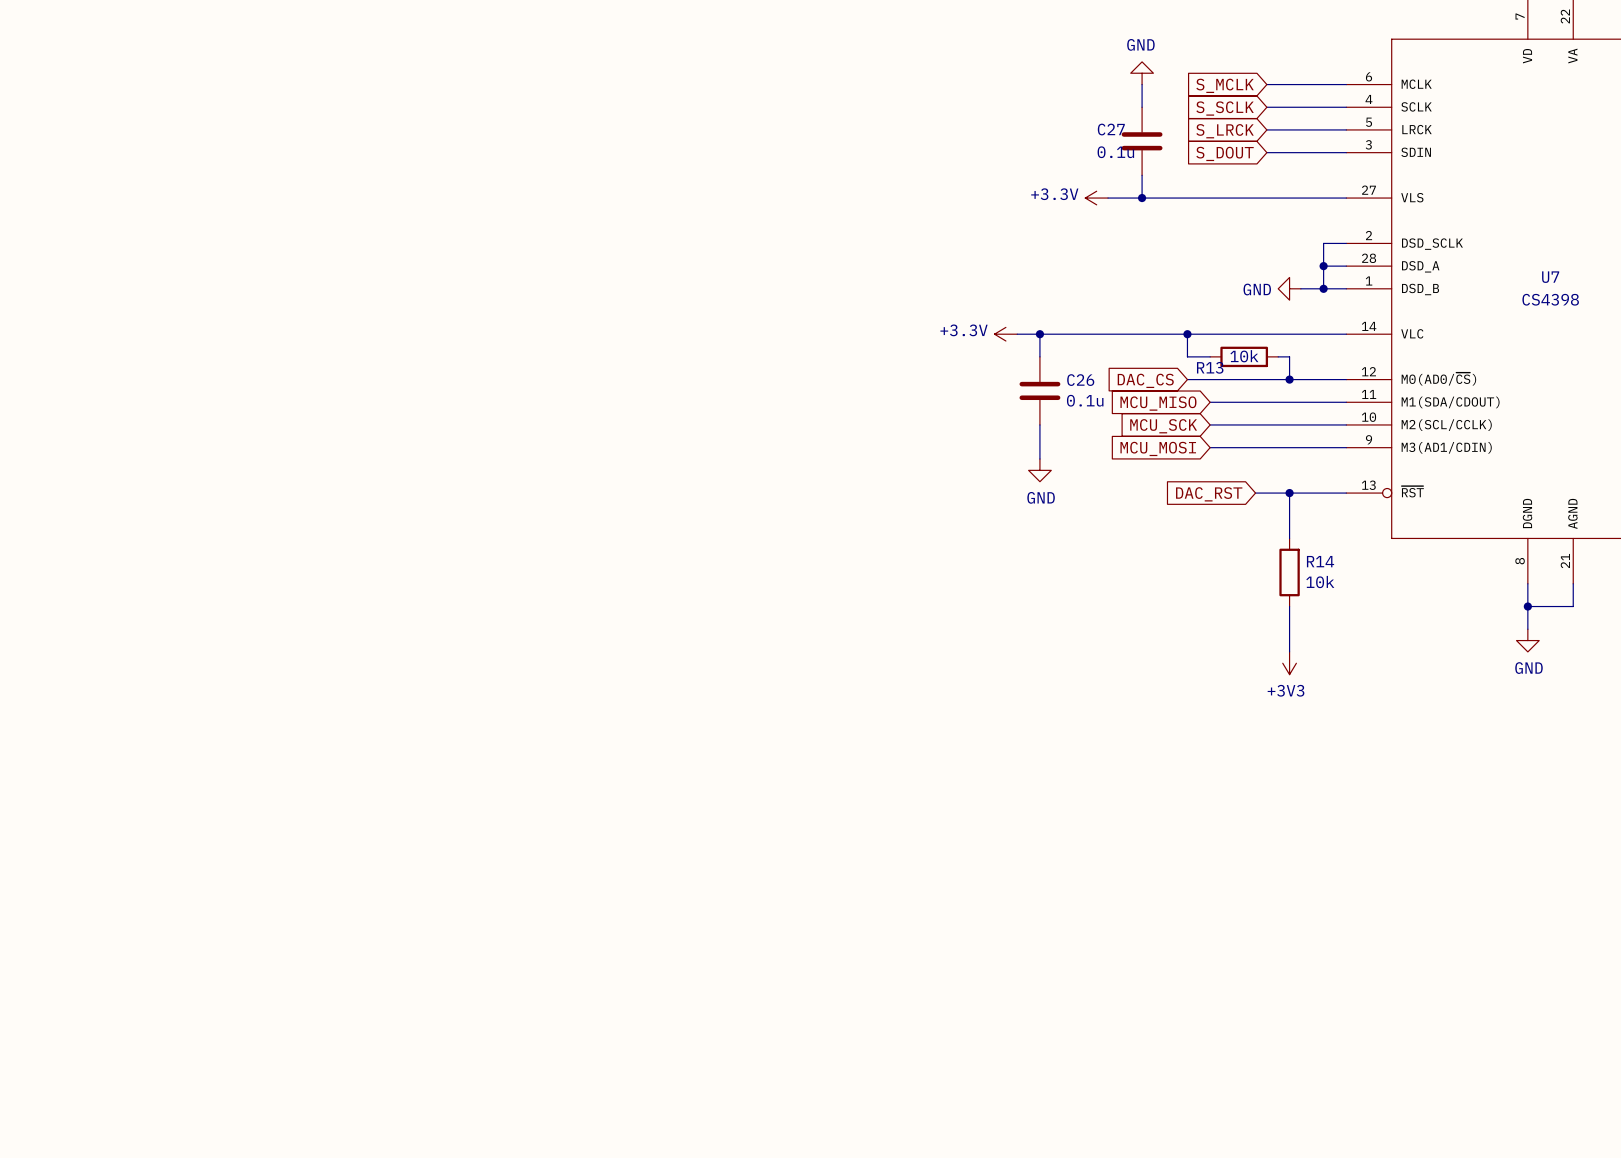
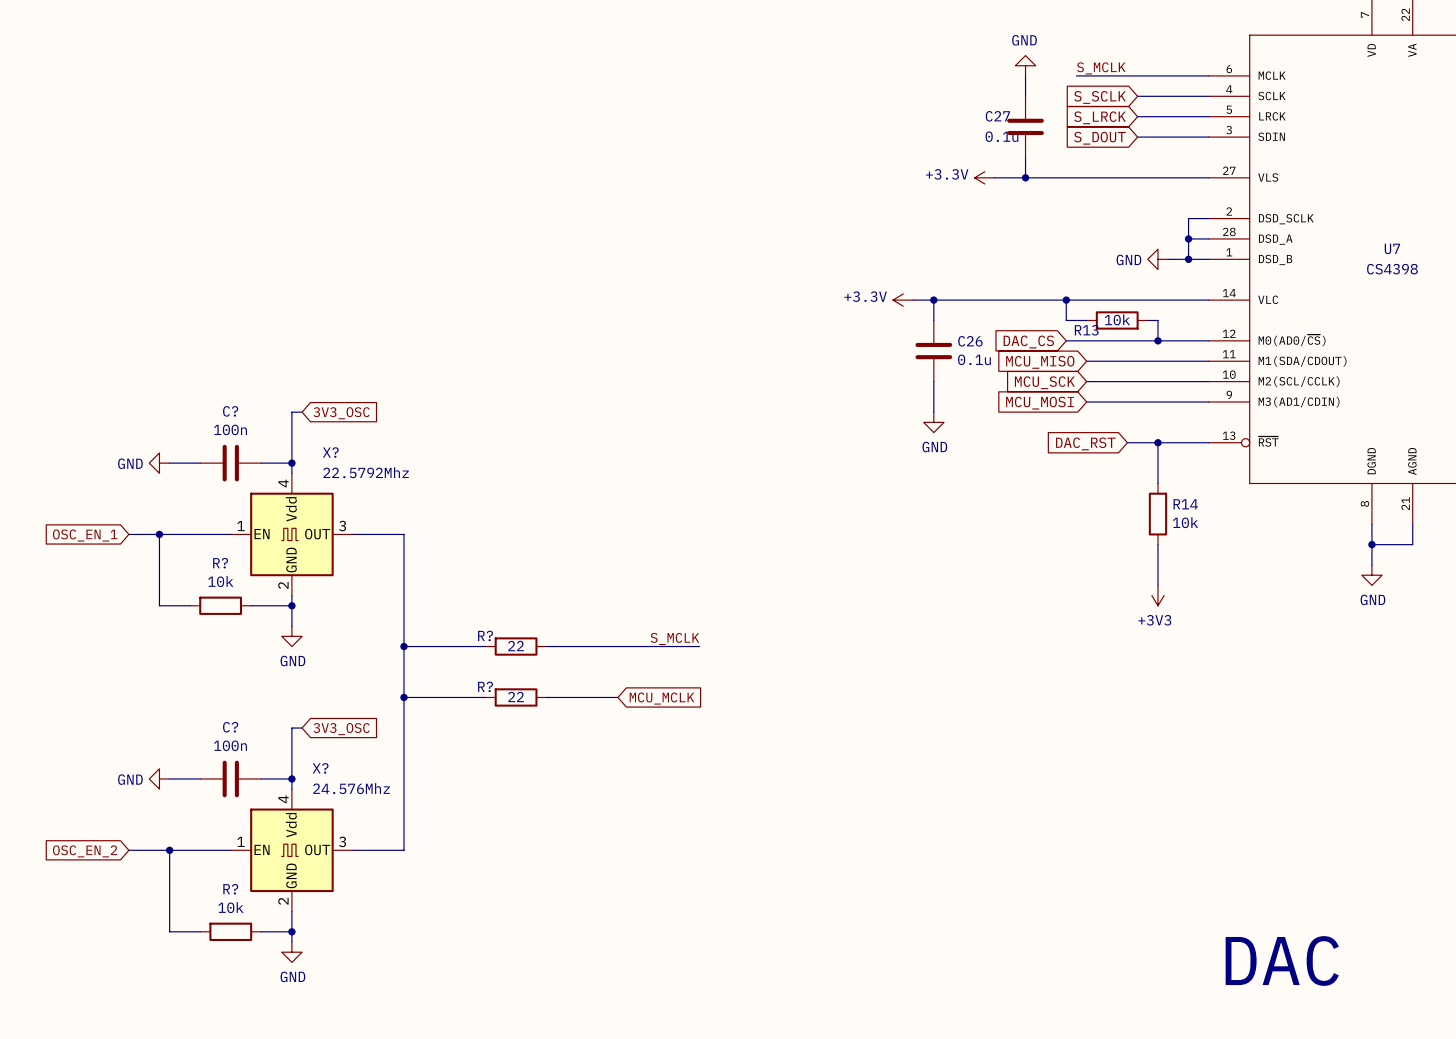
label: none -> S_MCLK (1101, 68)
wire: none -> (1076, 75) (1137, 75)
global label: S_MCLK (1225, 85) -> none
wire: none -> (302, 412) (291, 412) (291, 473)
global label: none -> 3V3_OSC (341, 413)
power symbol: none -> GND (159, 463)
wire: none -> (169, 463) (200, 463)
C?: none -> 100n (230, 463)
wire: none -> (261, 463) (291, 463)
junction: none -> (291, 463)
wire: none -> (128, 534) (230, 534)
wire: none -> (159, 534) (159, 605) (190, 605)
junction: none -> (159, 534)
X?: none -> 22.5792Mhz (291, 534)
wire: none -> (353, 534) (403, 534) (403, 850) (353, 850)
global label: none -> OSC_EN_1 (85, 535)
wire: none -> (291, 595) (291, 626)
R?: none -> 10k (220, 605)
wire: none -> (251, 605) (291, 605)
junction: none -> (291, 605)
power symbol: none -> GND (291, 636)
label: none -> S_MCLK (674, 638)
wire: none -> (403, 646) (485, 646)
junction: none -> (403, 646)
R?: none -> 22 (516, 646)
wire: none -> (546, 646) (699, 646)
wire: none -> (403, 697) (485, 697)
junction: none -> (403, 697)
R?: none -> 22 (516, 697)
wire: none -> (546, 697) (617, 697)
global label: none -> MCU_MCLK (661, 698)
wire: none -> (302, 728) (291, 728) (291, 789)
global label: none -> 3V3_OSC (341, 729)
power symbol: none -> GND (159, 778)
wire: none -> (169, 778) (200, 778)
C?: none -> 100n (230, 778)
wire: none -> (261, 778) (291, 778)
junction: none -> (291, 778)
wire: none -> (128, 850) (230, 850)
wire: none -> (169, 850) (169, 931) (200, 931)
junction: none -> (169, 850)
X?: none -> 24.576Mhz (291, 850)
global label: none -> OSC_EN_2 (85, 851)
wire: none -> (291, 911) (291, 942)
R?: none -> 10k (230, 931)
wire: none -> (261, 931) (291, 931)
junction: none -> (291, 931)
power symbol: none -> GND (291, 952)
text: none -> DAC (1282, 961)

